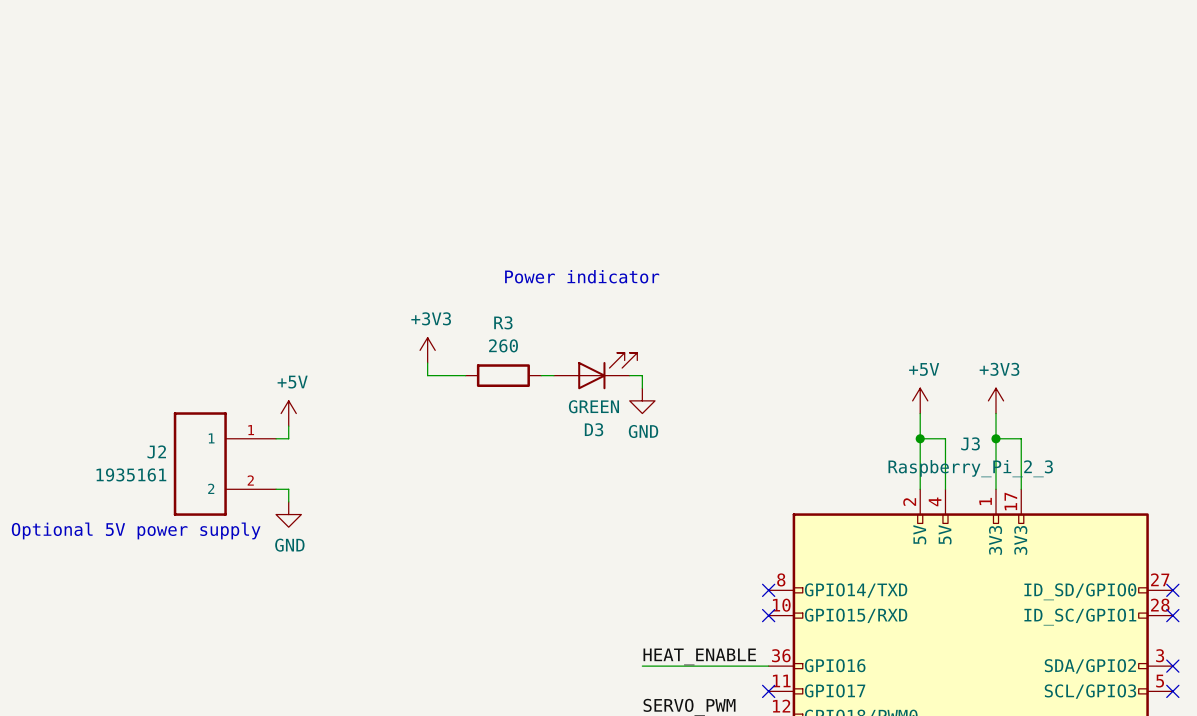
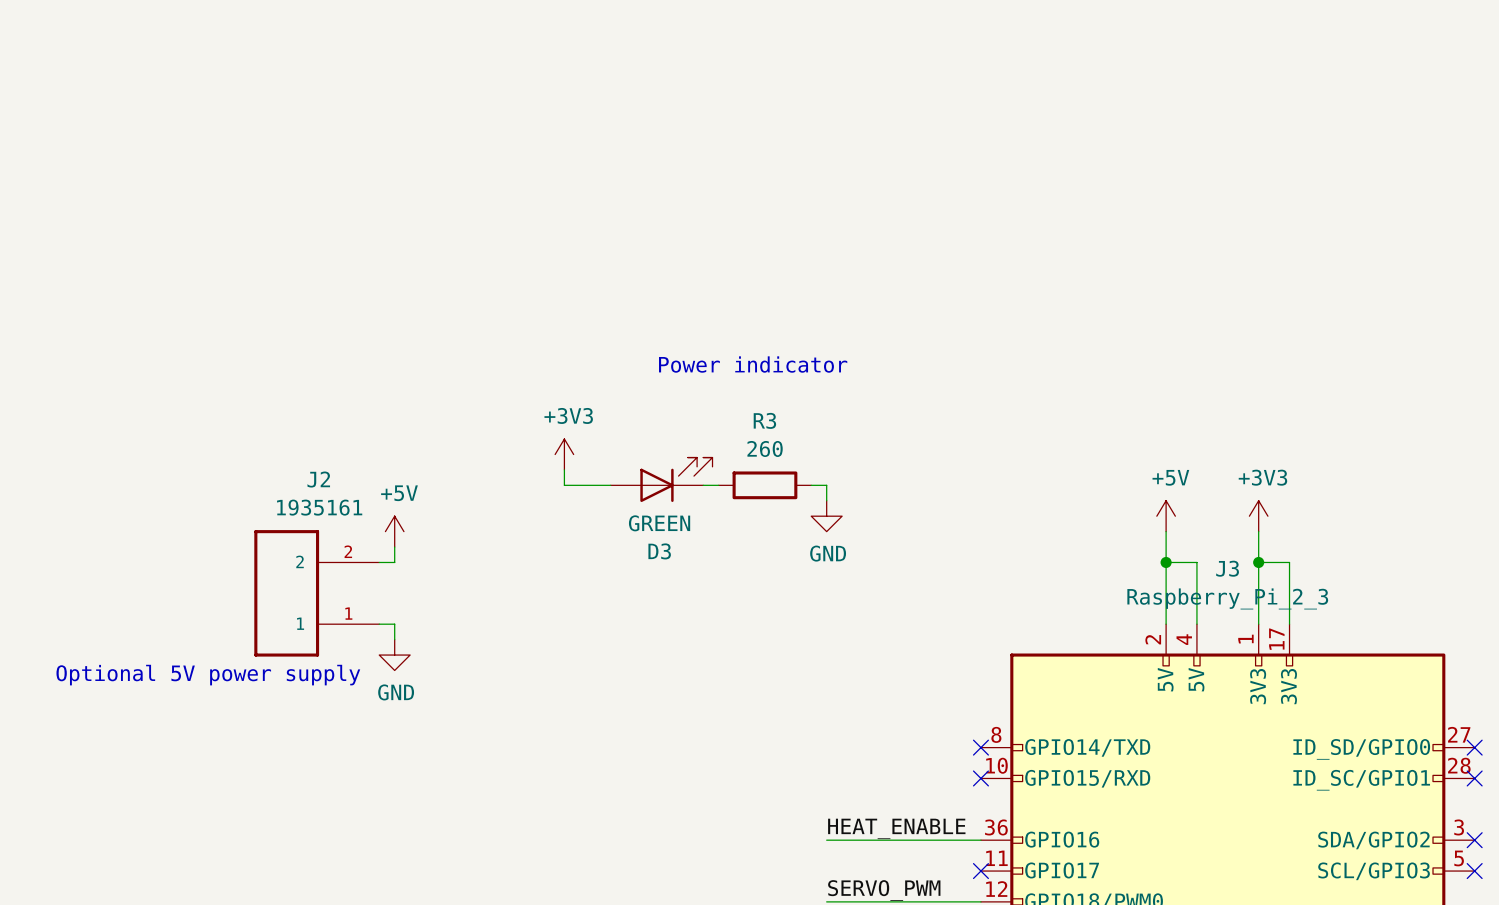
D3 position: (595, 371) -> (661, 479)
R3 position: (503, 375) -> (764, 485)
J2 name position: J2 (156, 451) -> J2 (318, 479)
J2 flip: as is (200, 464) -> up-down (286, 593)
J2 value position: 1935161 (131, 474) -> 1935161 (319, 507)

